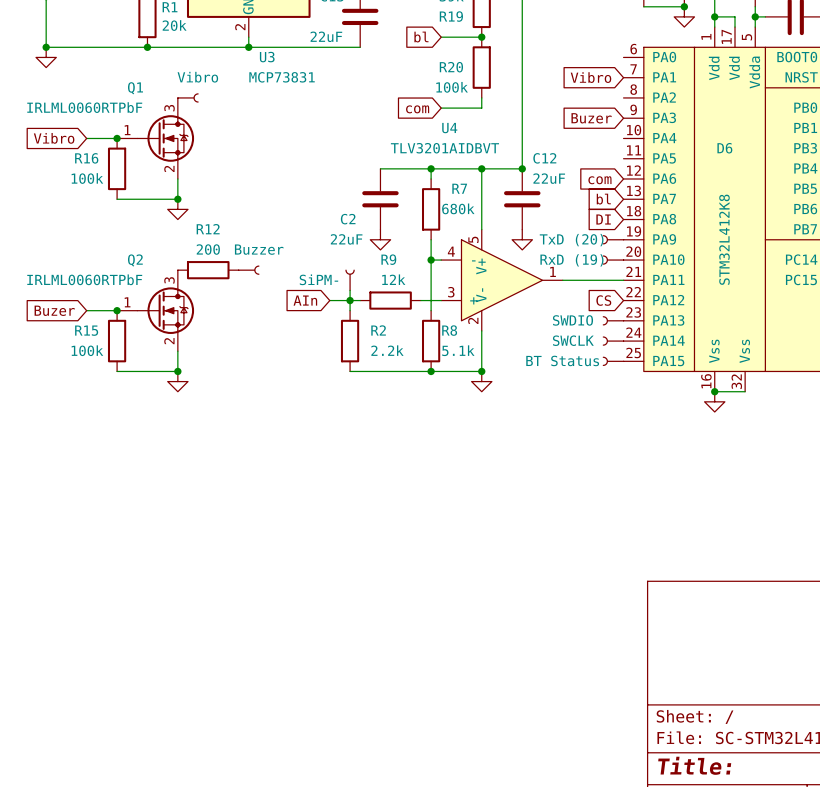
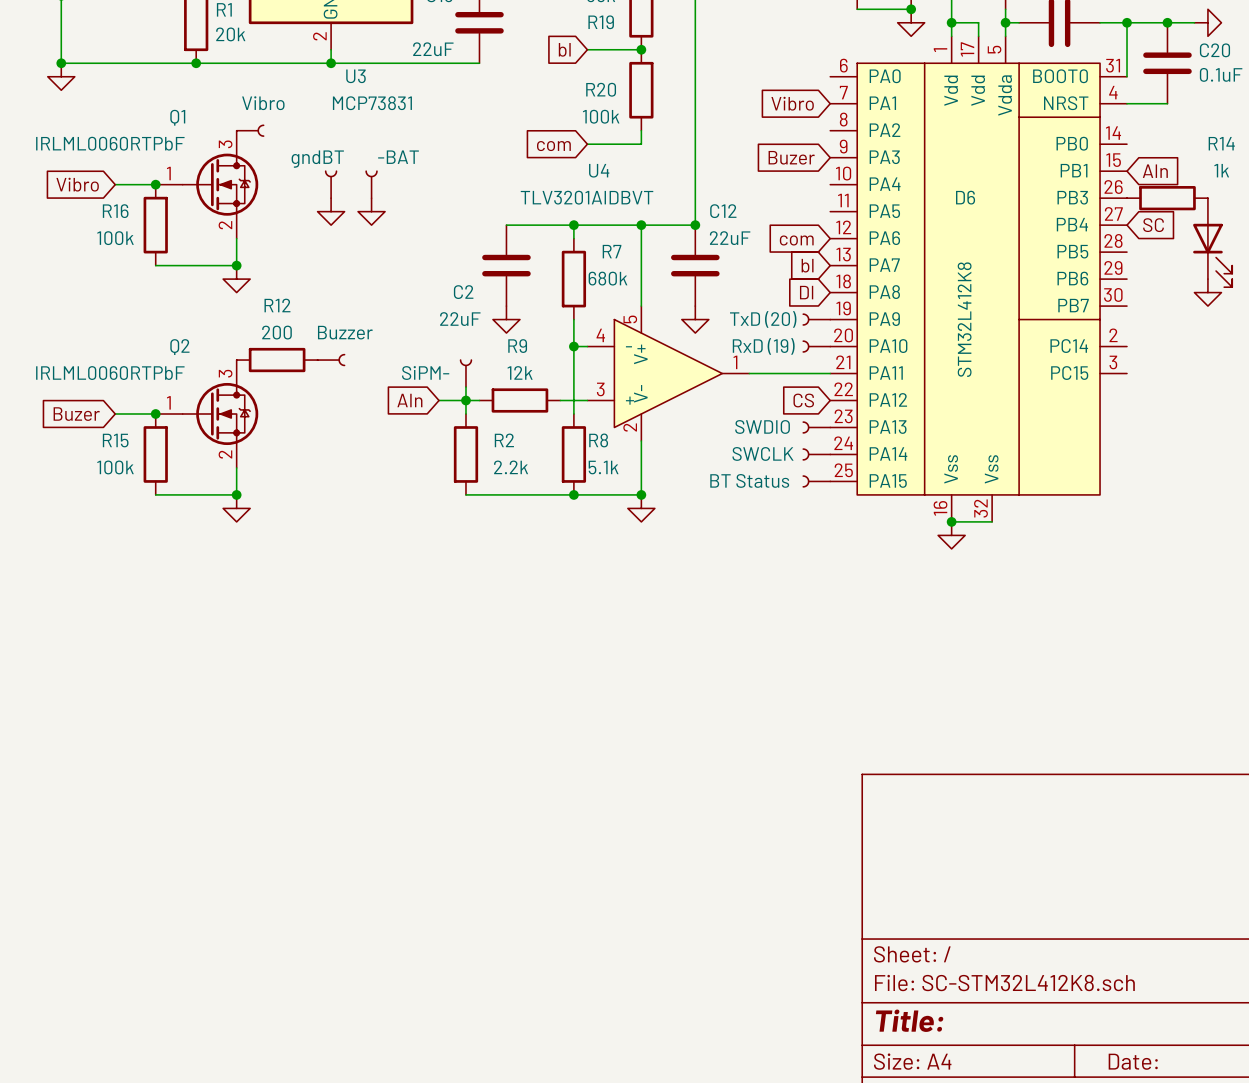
part: none -> gndBT (331, 184)
part: none -> -BAT (371, 184)
power symbol: none -> (331, 211)
power symbol: none -> (371, 211)

